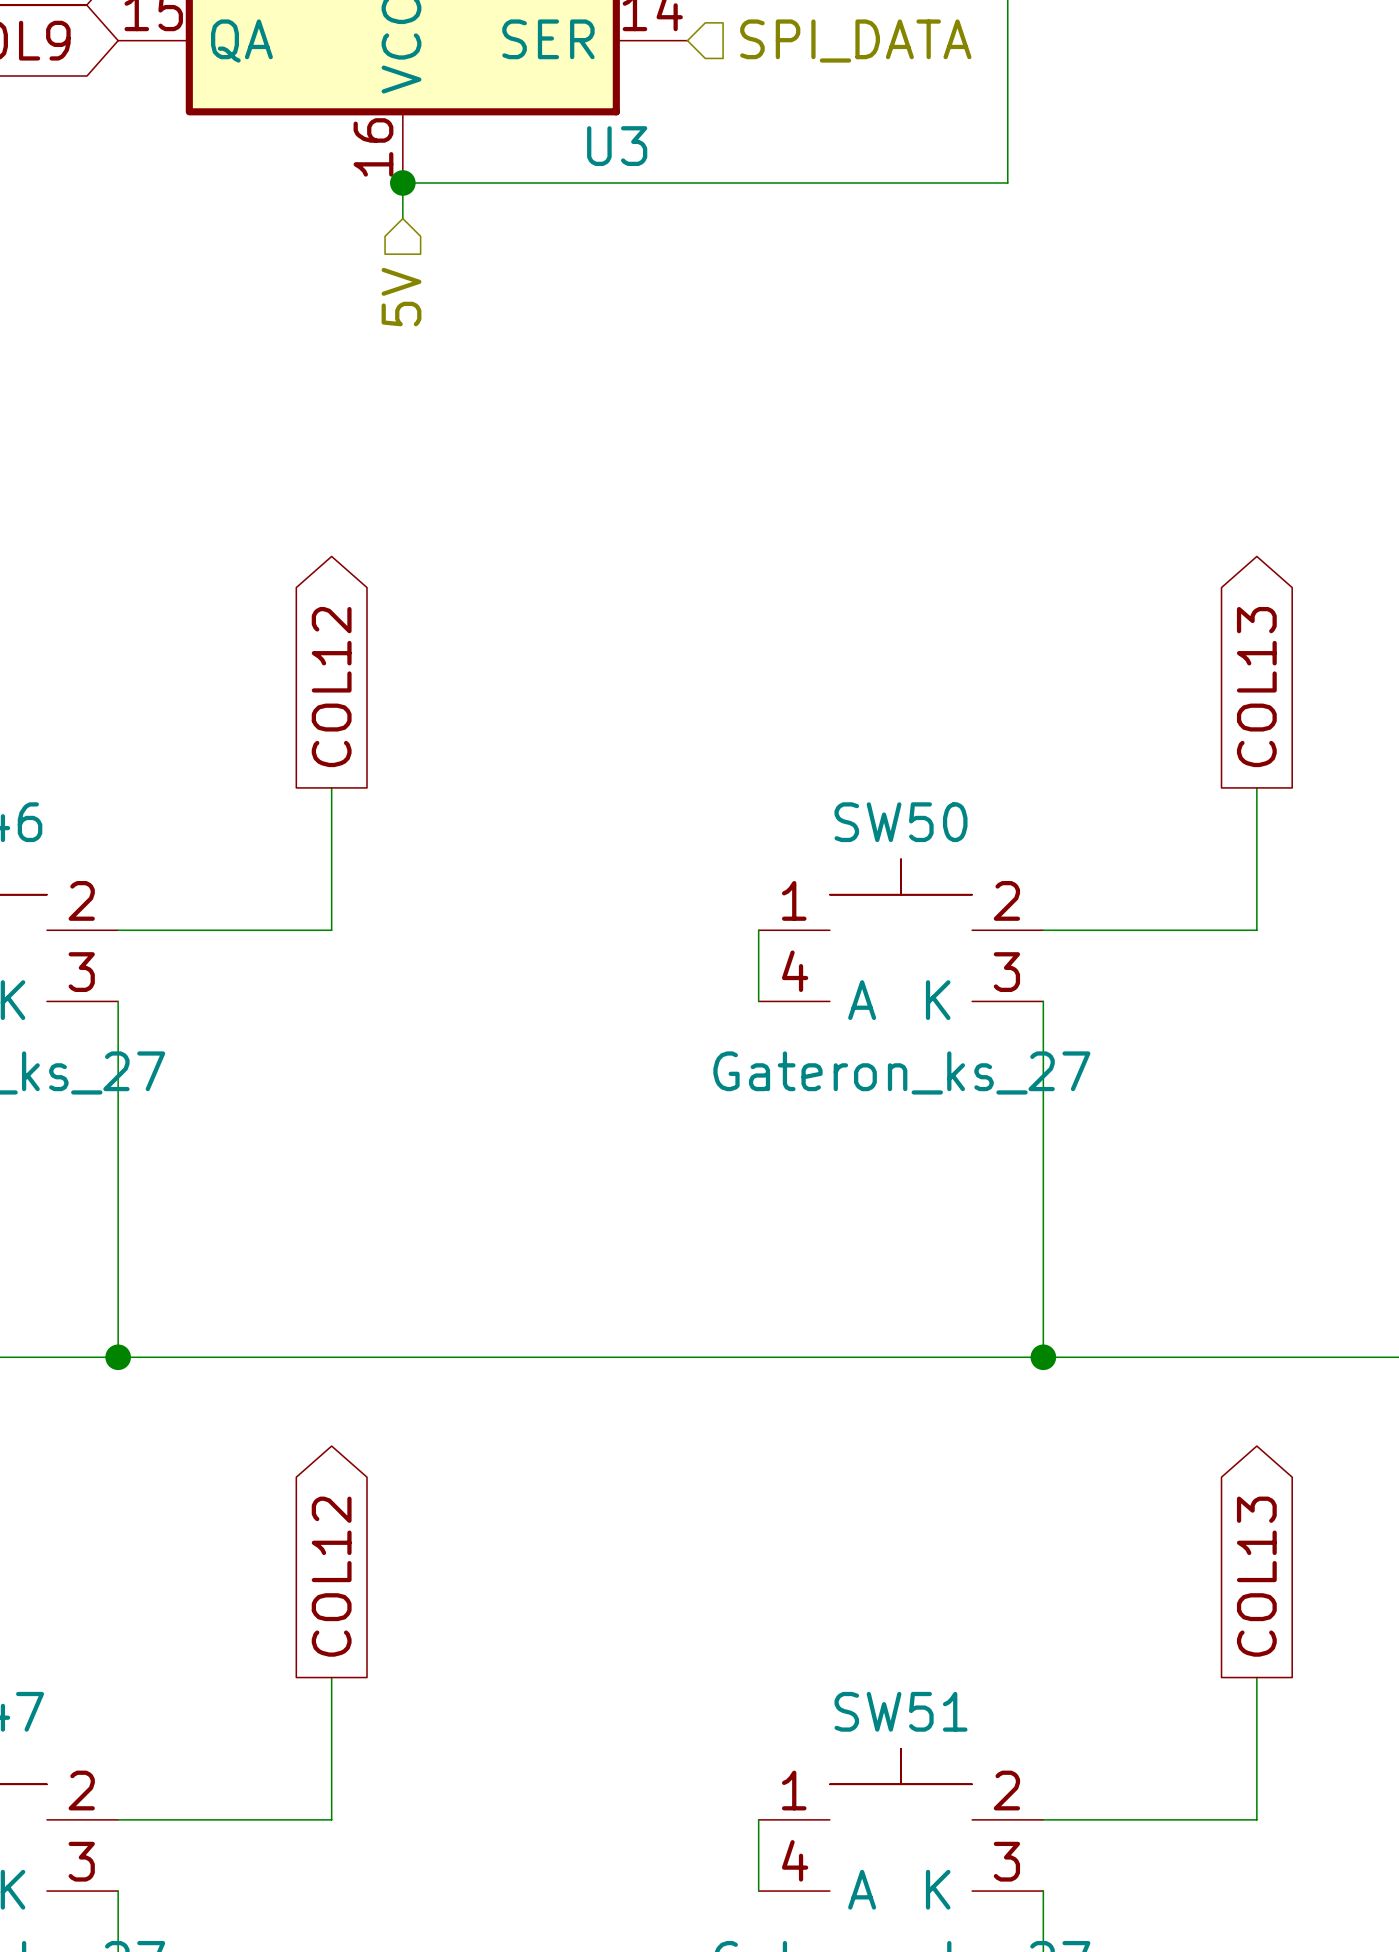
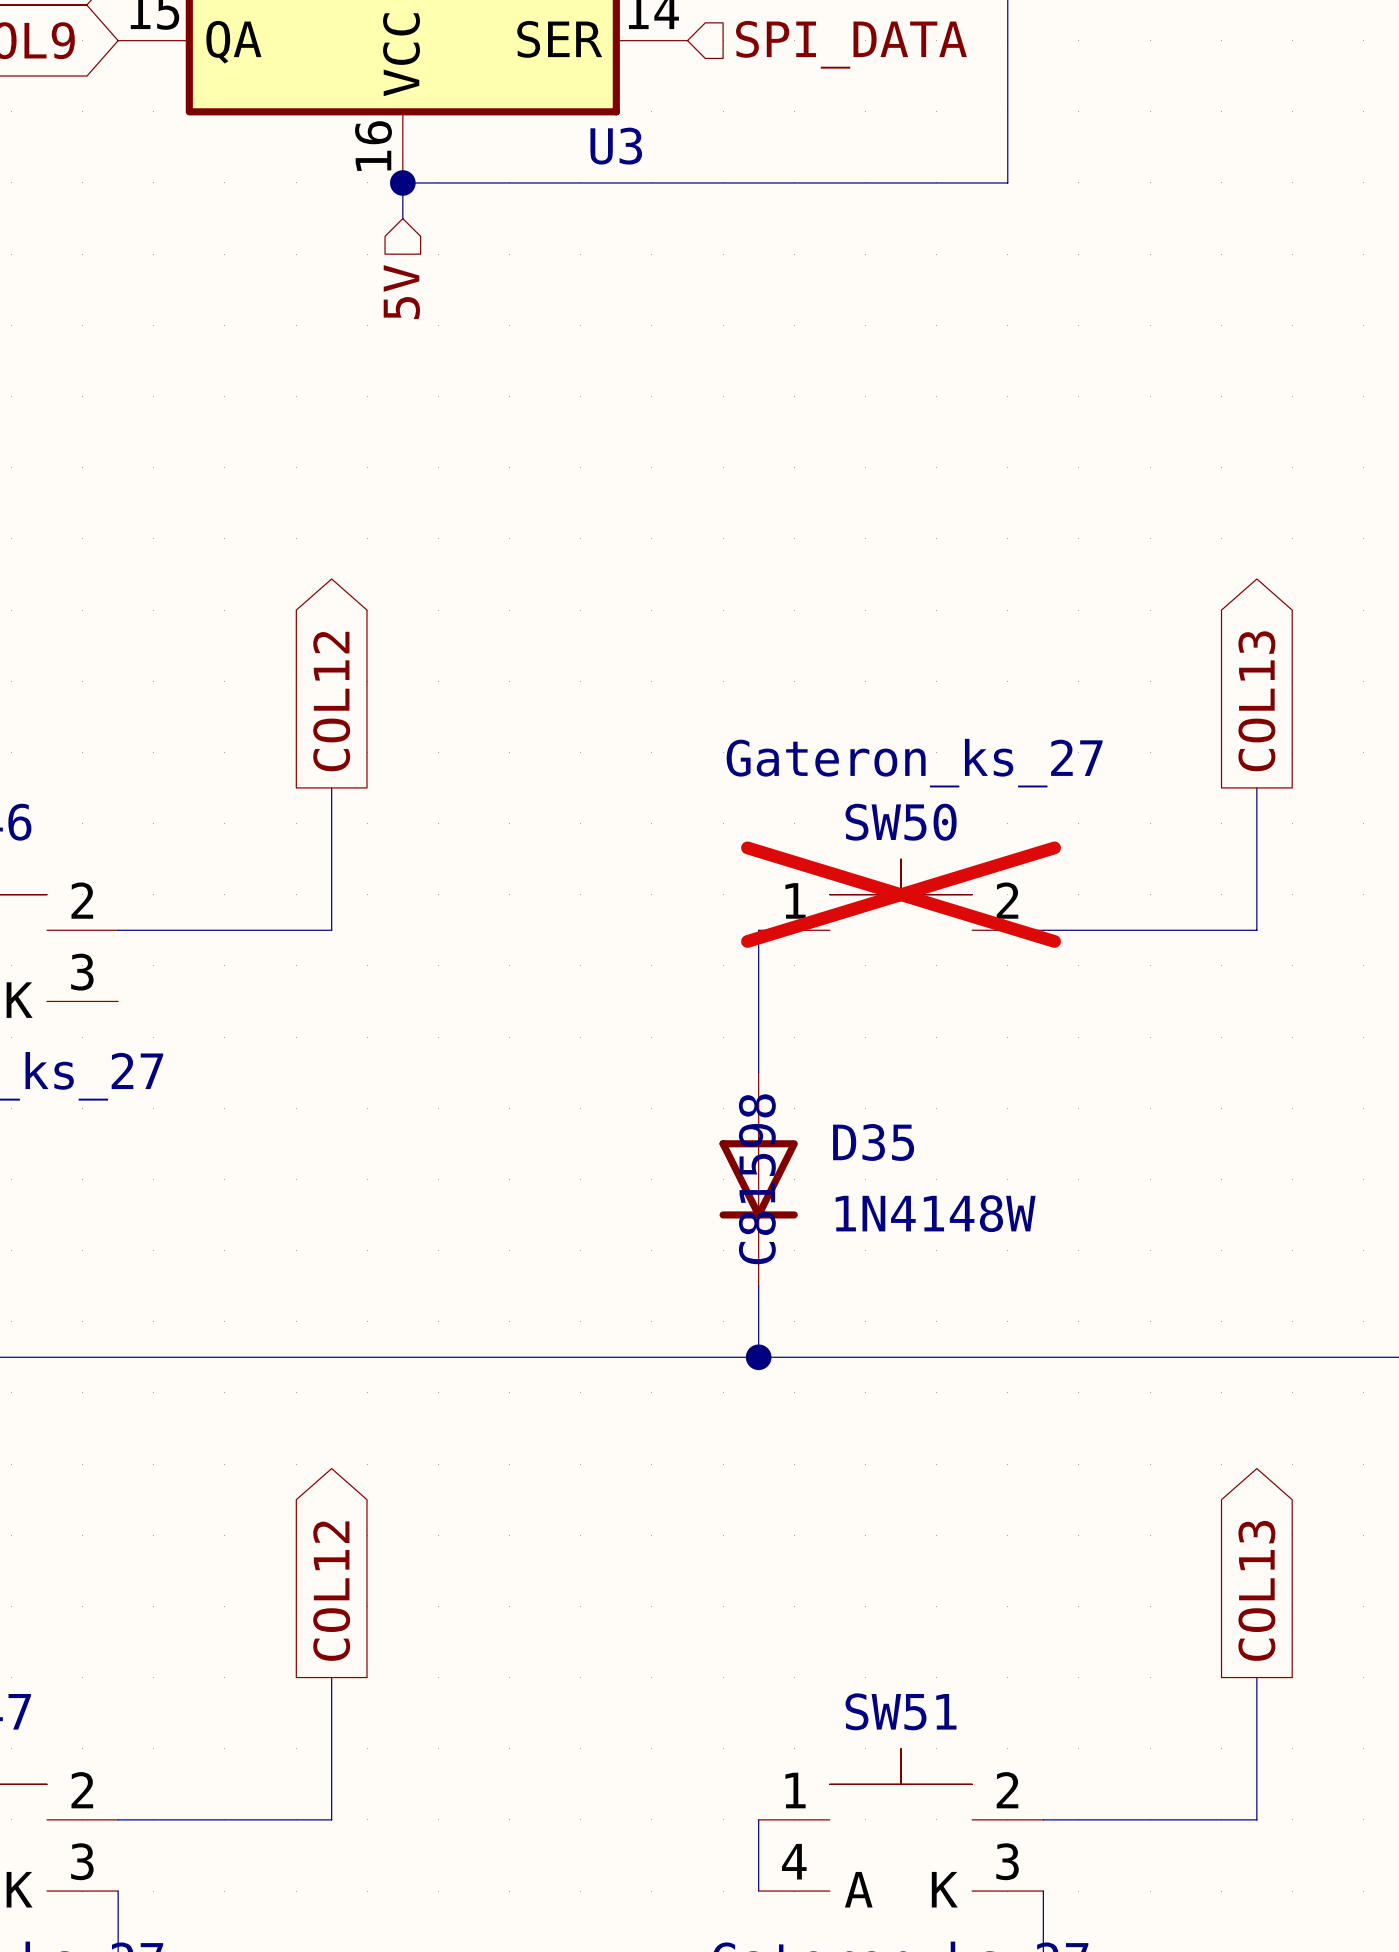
SW50 symbol: [758, 859, 1044, 1002] -> [758, 859, 1044, 931]
SW50 do-not-place cross: none -> (901, 894)
wire: (118, 1001) (118, 1357) -> none
wire: none -> (758, 1001) (758, 1072)
wire: (1043, 1001) (1043, 1357) -> none
SW50 value position: Gateron_ks_27 (901, 1072) -> Gateron_ks_27 (914, 763)
D35: none -> 1N4148W (758, 1179)
wire: none -> (758, 1286) (758, 1357)
junction: (118, 1357) -> none
junction: none -> (758, 1357)
junction: (1043, 1357) -> none

